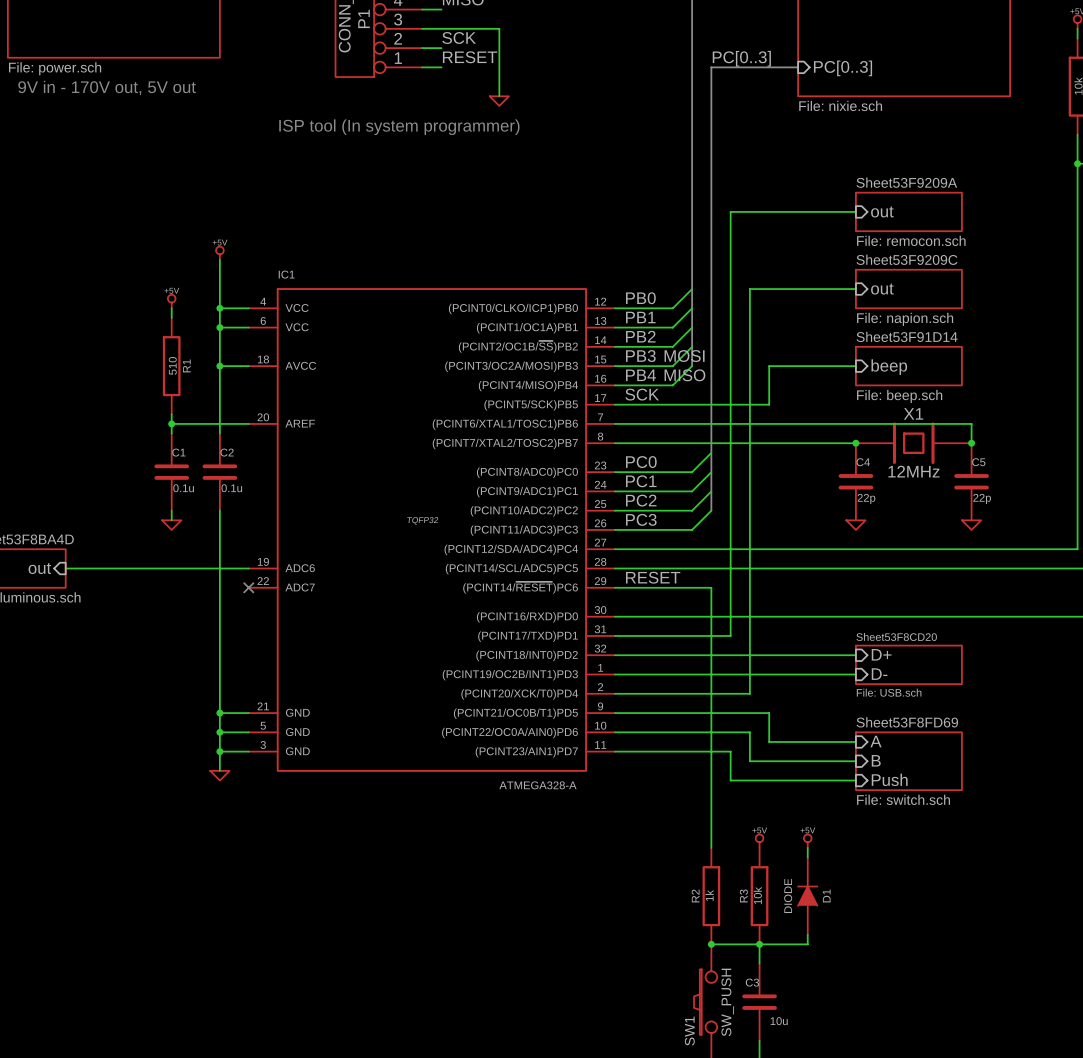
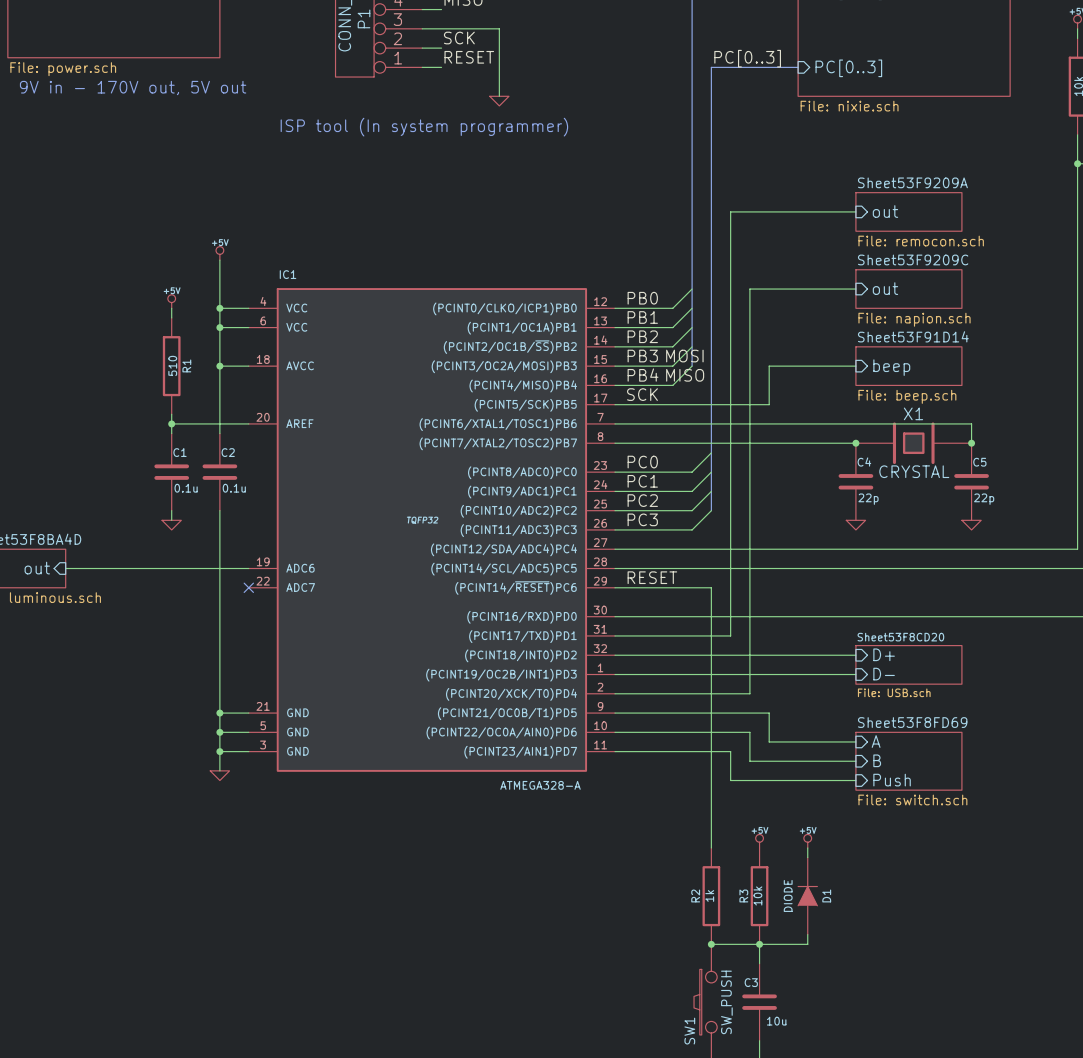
X1 value: 12MHz (913, 471) -> CRYSTAL (914, 471)

